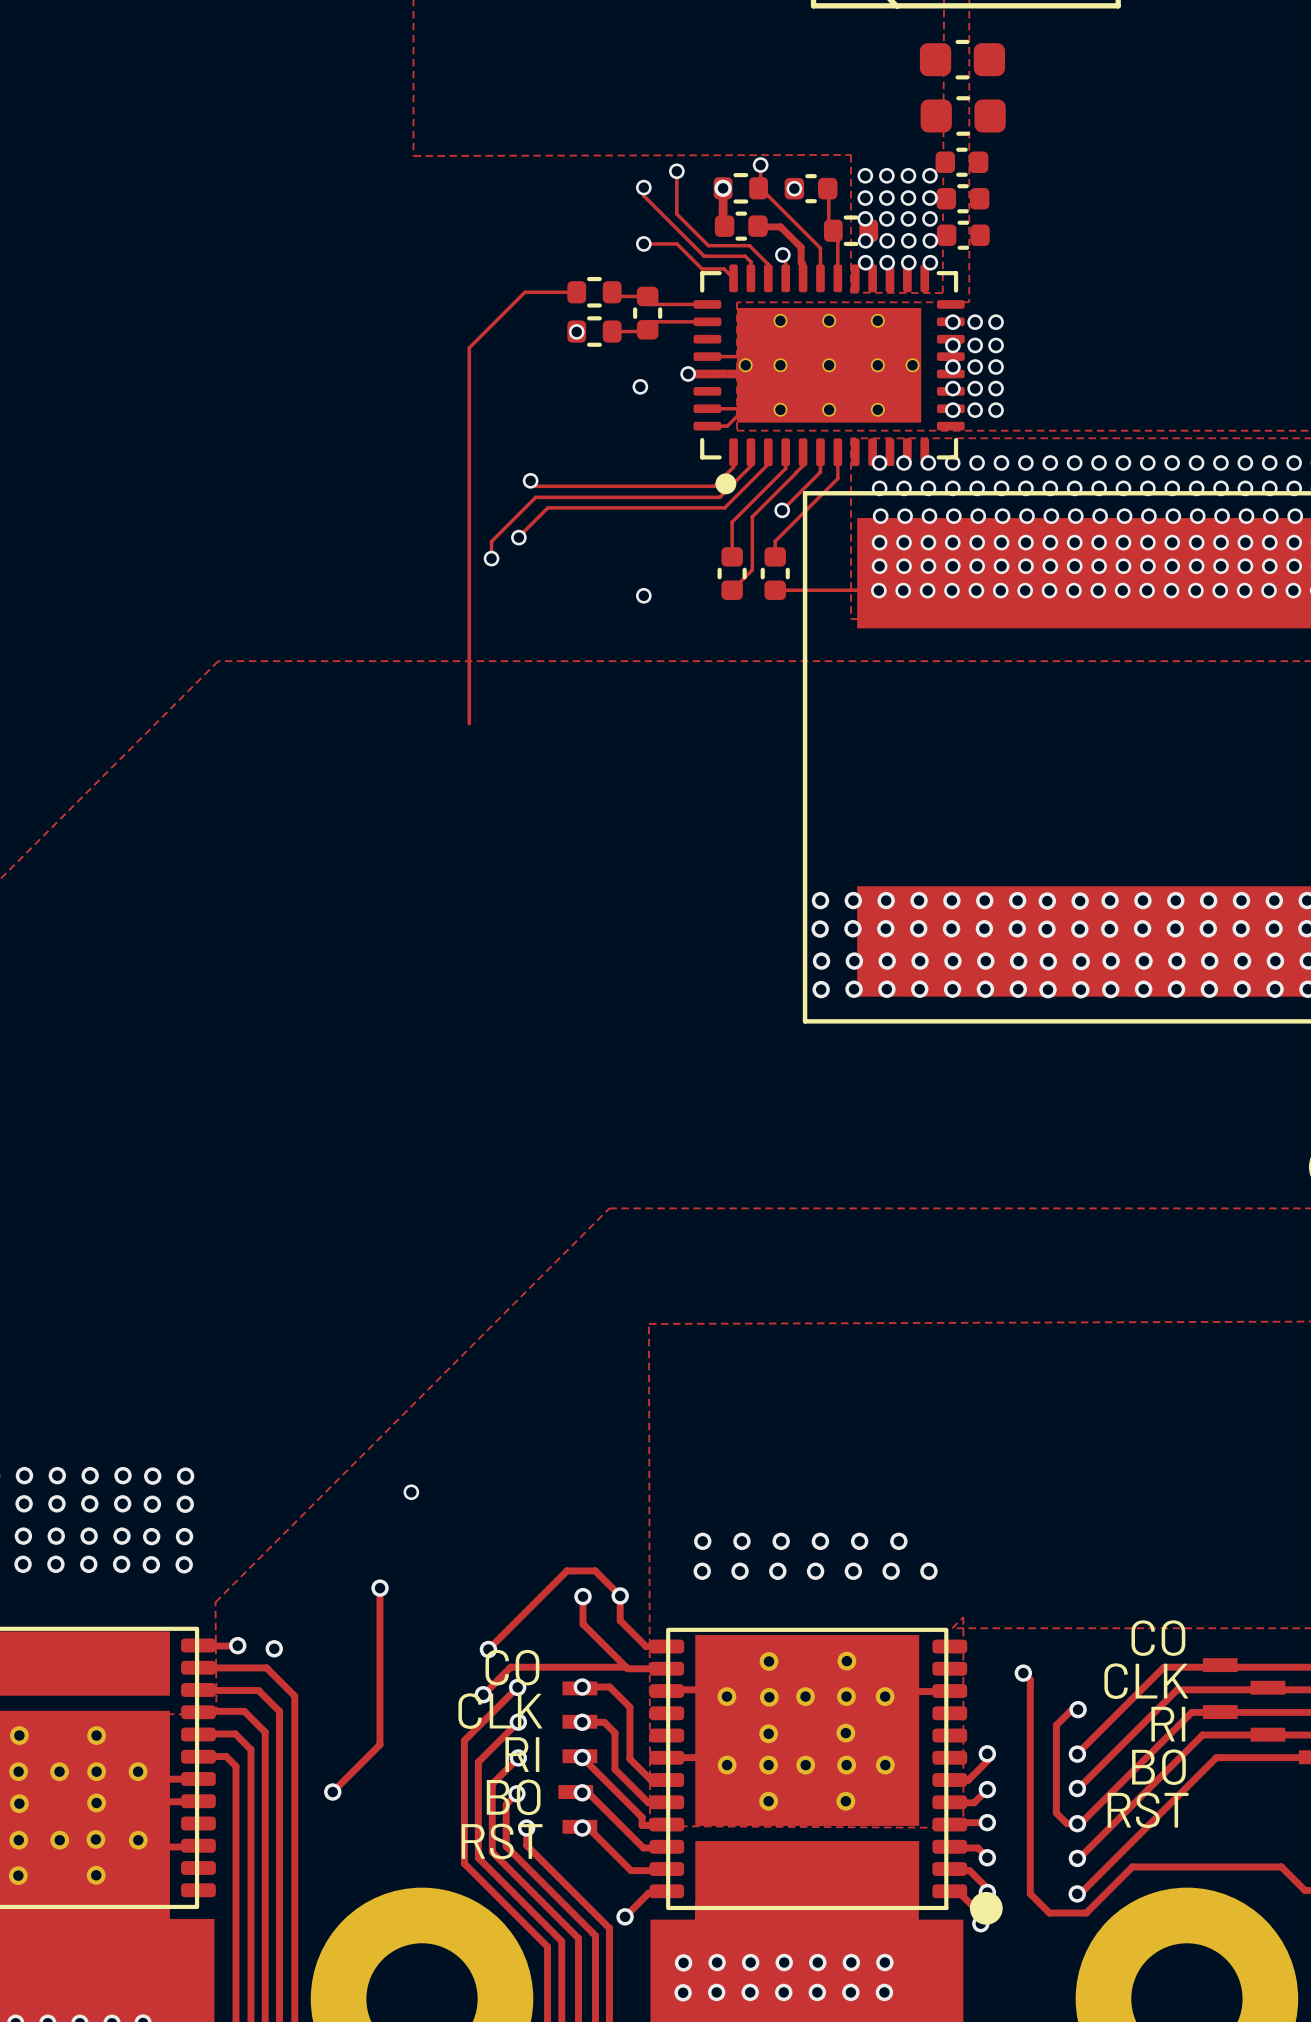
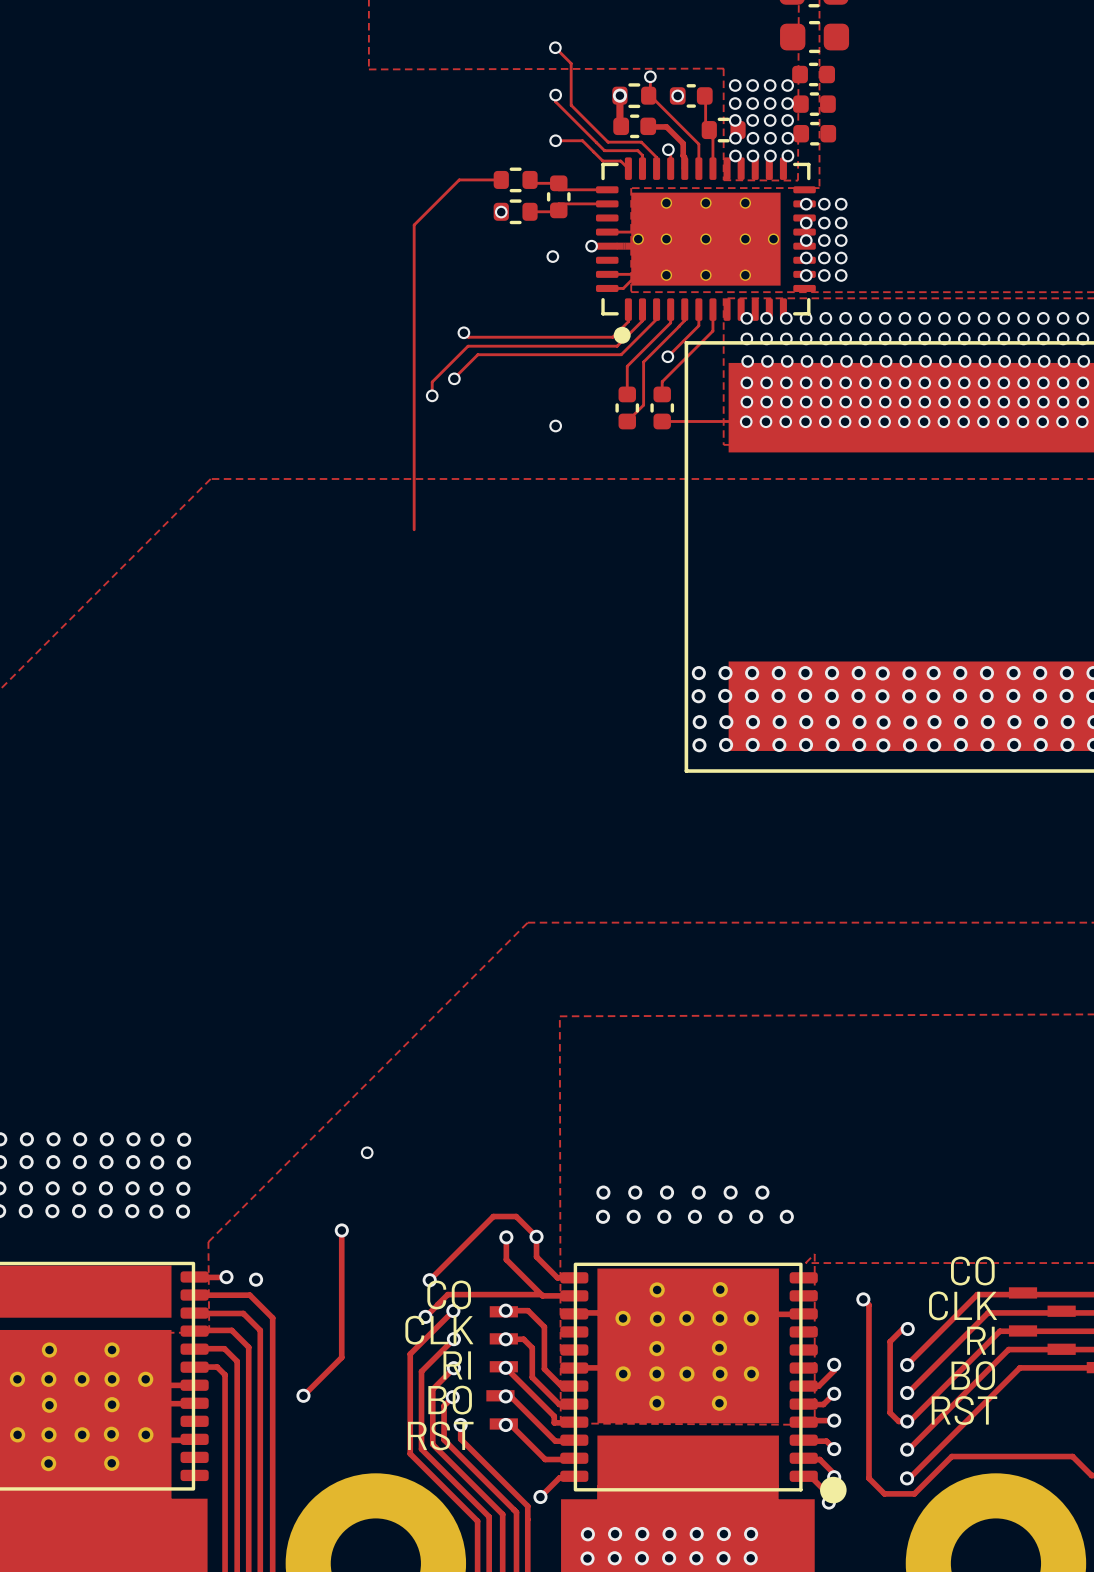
track: (676, 171) (676, 214) -> (555, 47) (571, 63) (571, 105) (582, 116)
via position: (676, 171) -> (555, 47)

